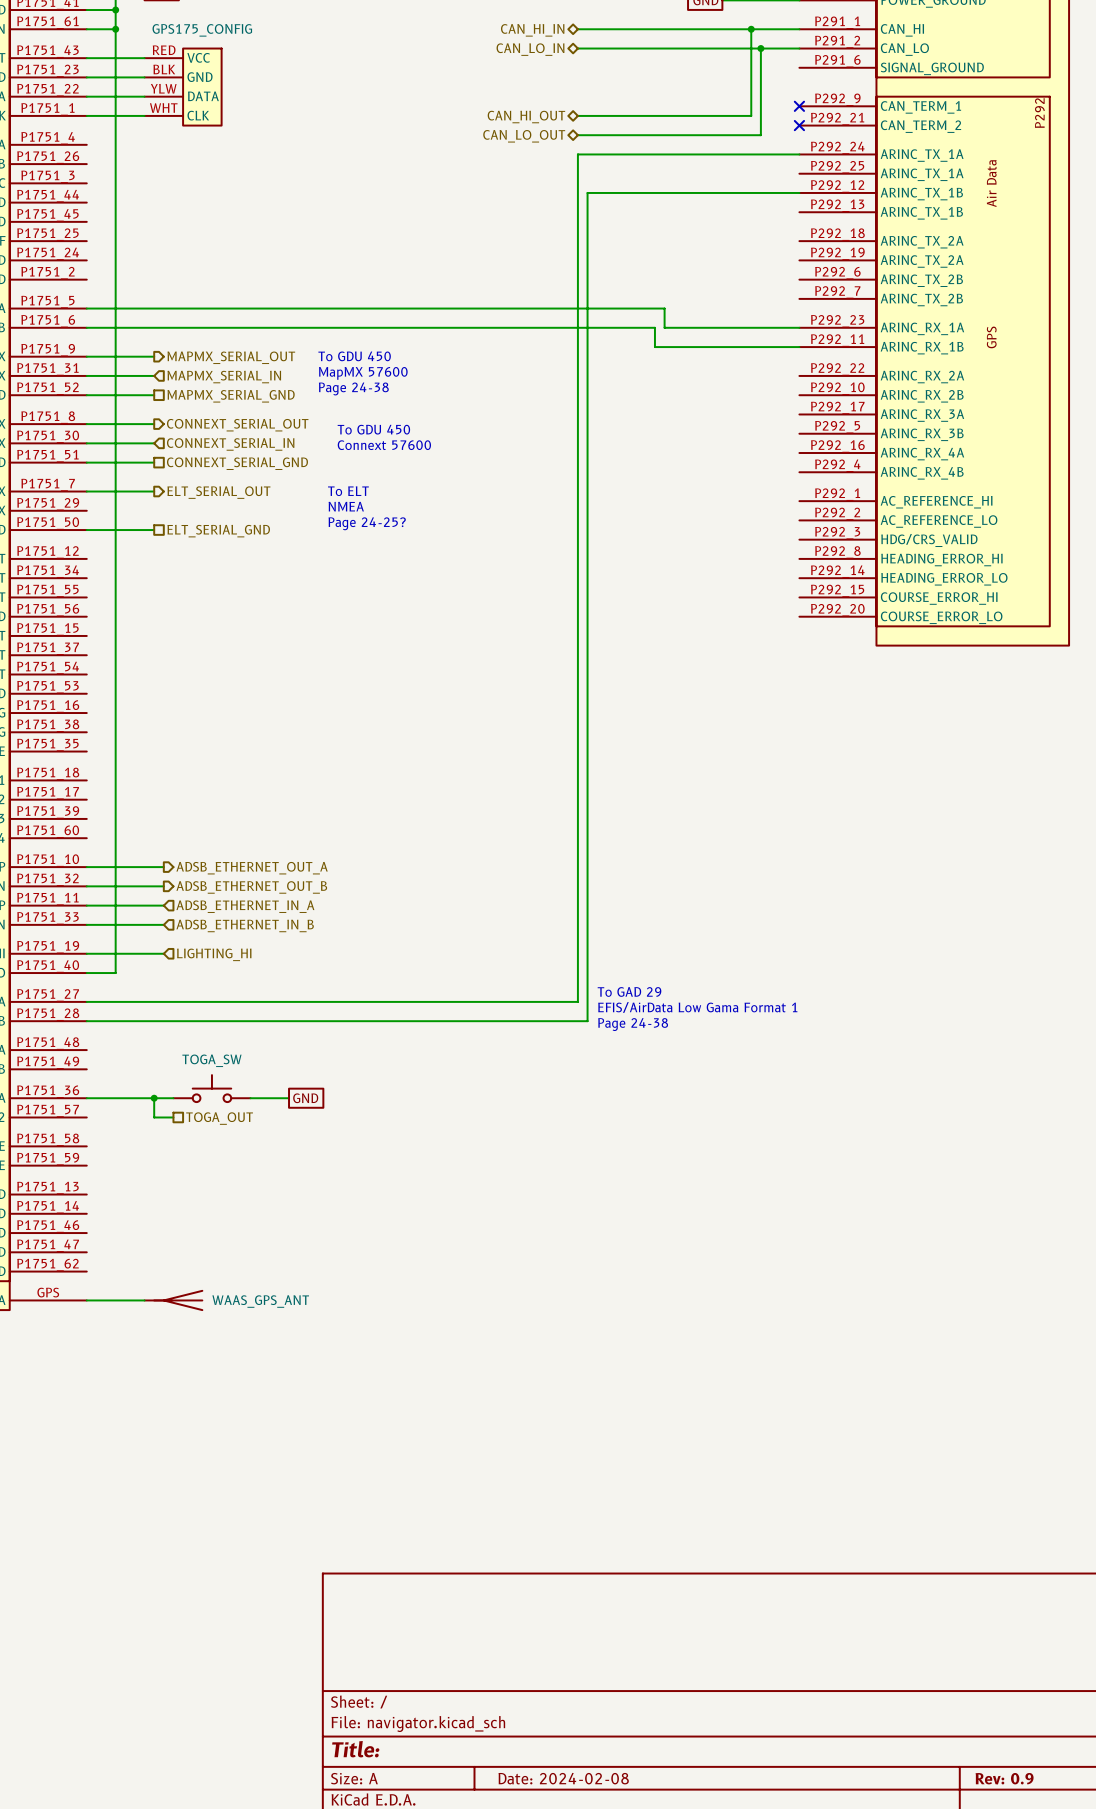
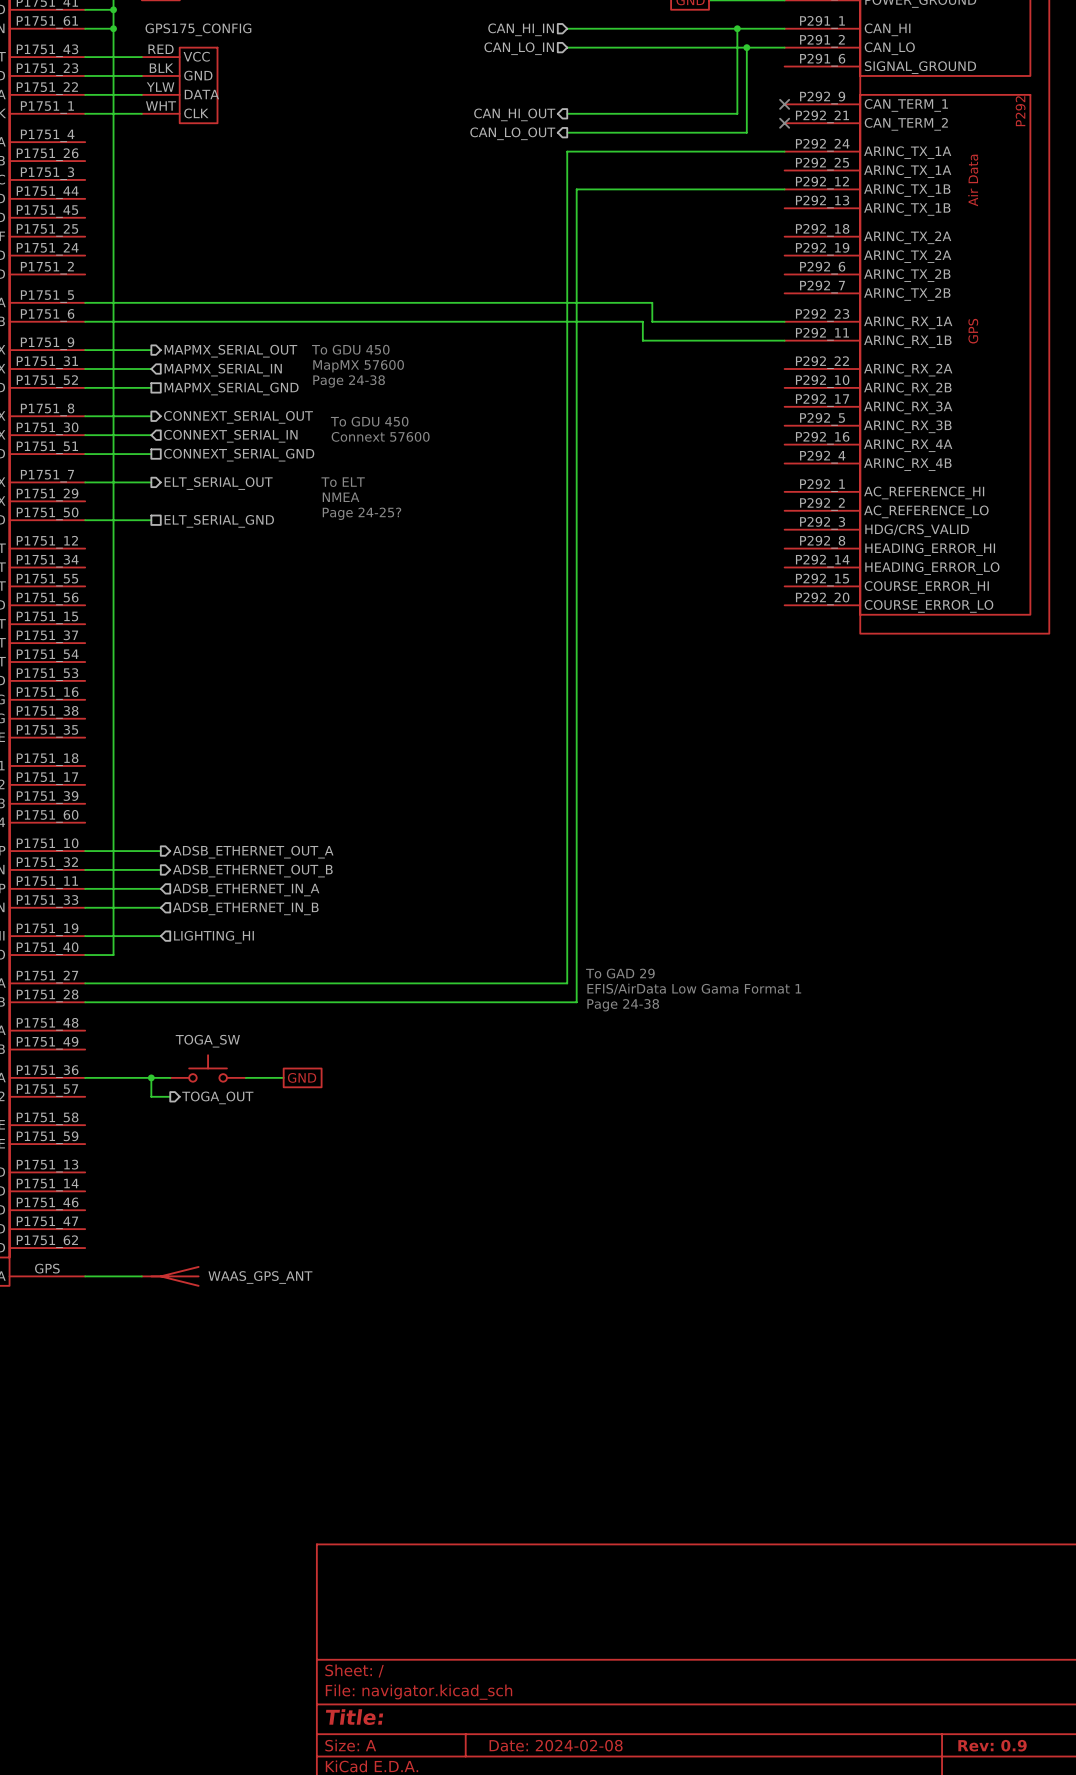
hierarchical label shape: bidirectional (532, 30) -> input (521, 29)
hierarchical label shape: bidirectional (530, 49) -> input (519, 48)
hierarchical label shape: bidirectional (526, 117) -> output (514, 114)
hierarchical label shape: bidirectional (524, 136) -> output (512, 133)
hierarchical label shape: passive (219, 1118) -> output (217, 1097)

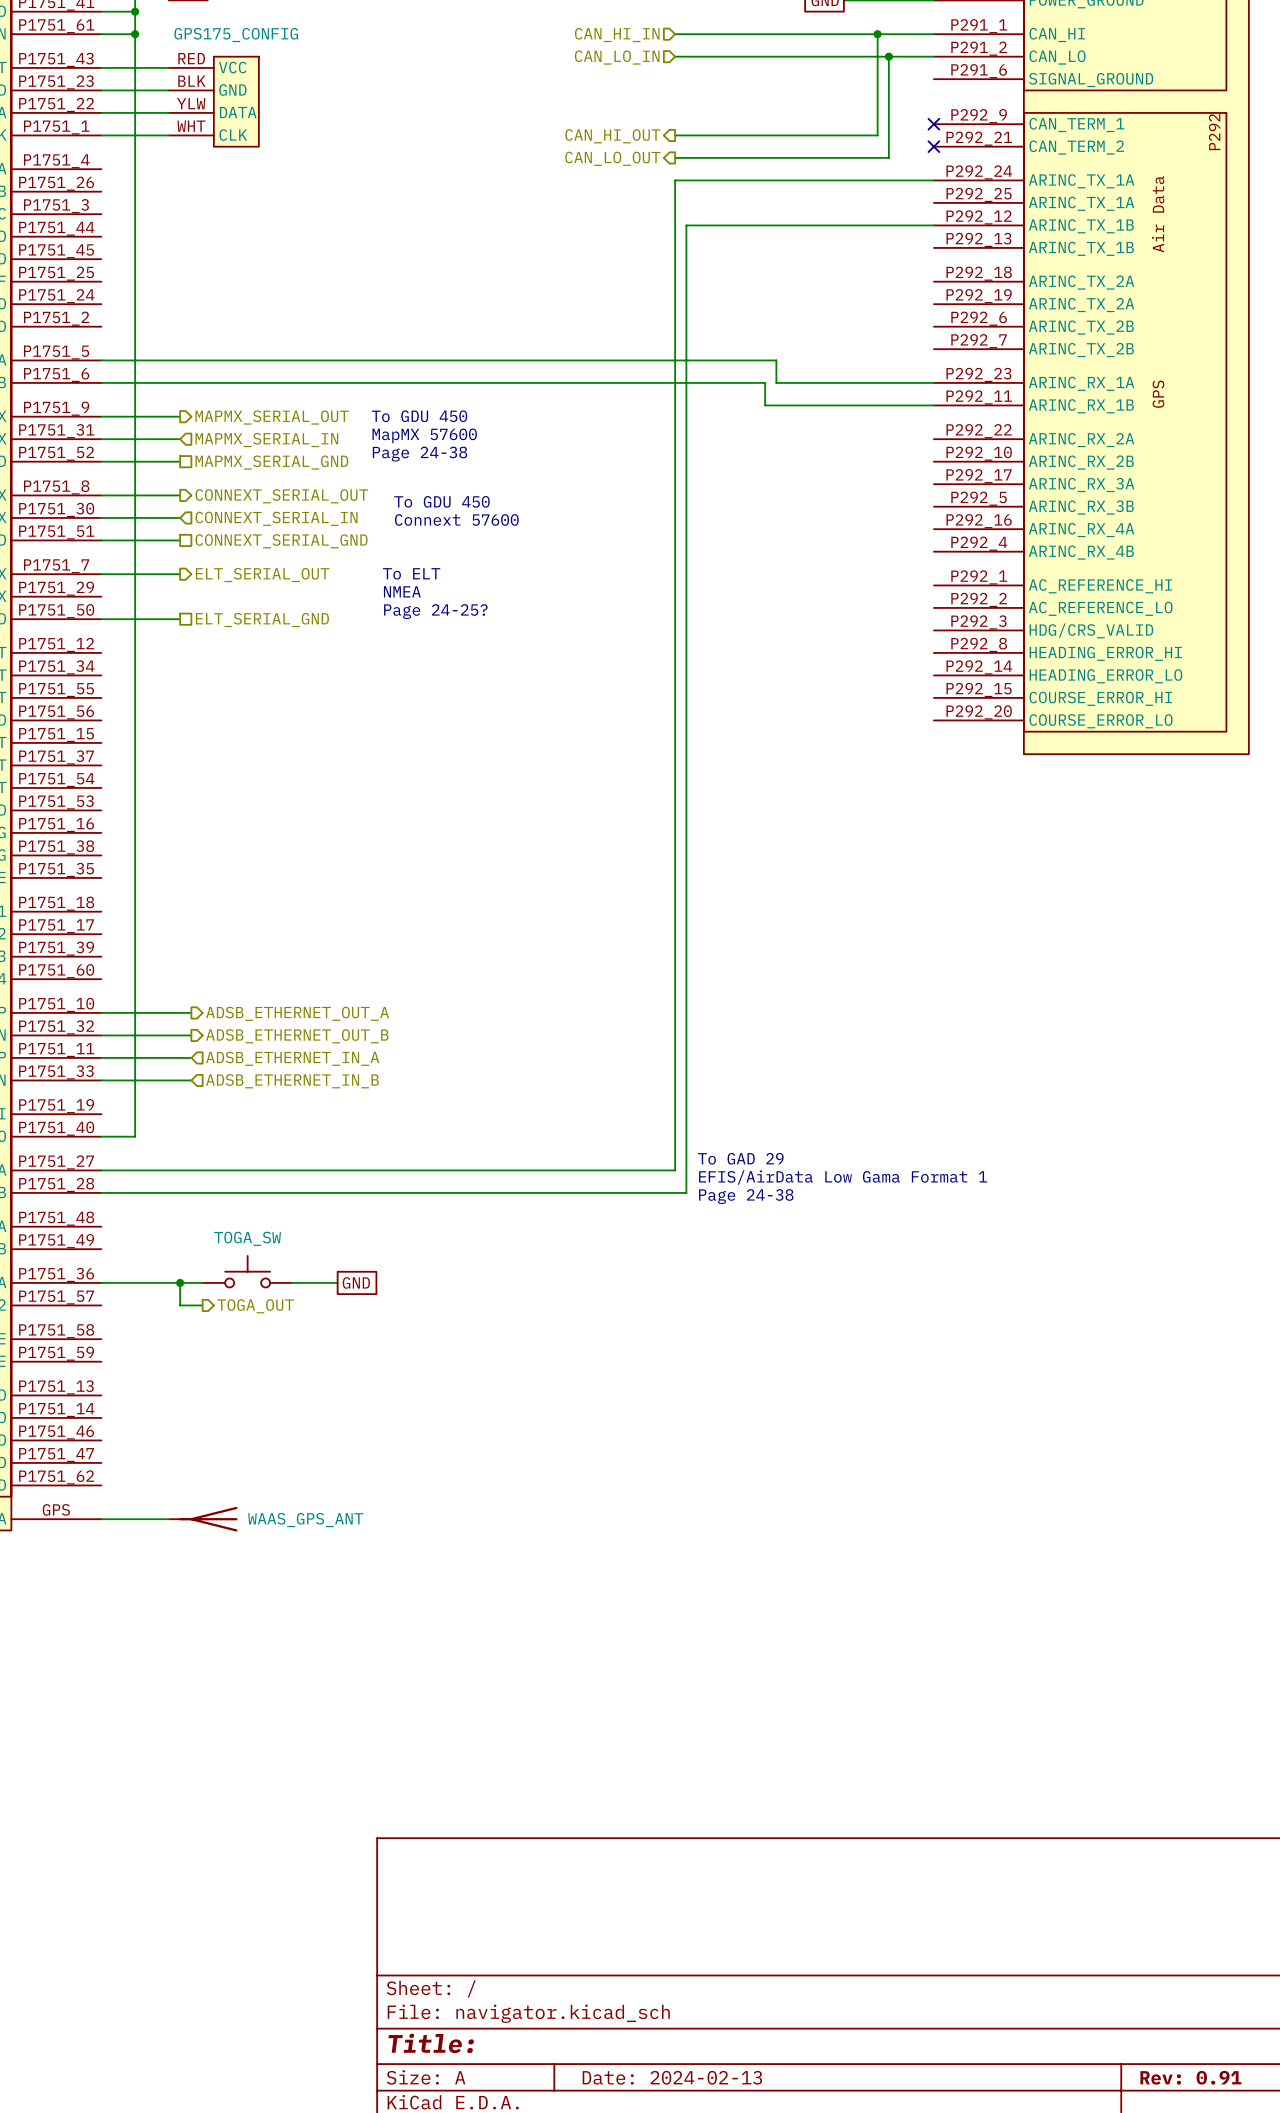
wire: (85, 936) (160, 936) -> none
hierarchical label: LIGHTING_HI (213, 937) -> none
title block: Date: 2024-02-08 (556, 1745) -> Date: 2024-02-13 (672, 2077)
title block: Rev: 0.9 (992, 1745) -> Rev: 0.91 (1190, 2077)

